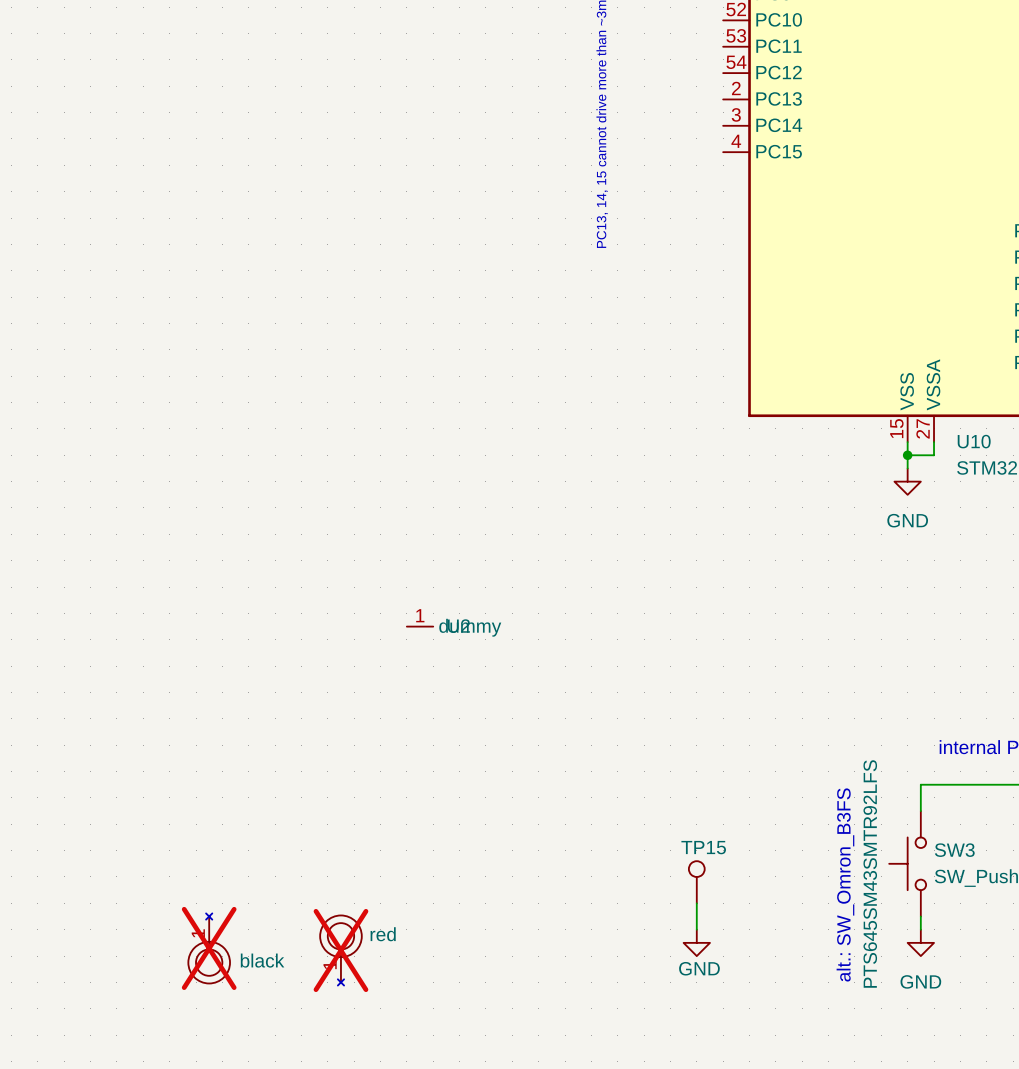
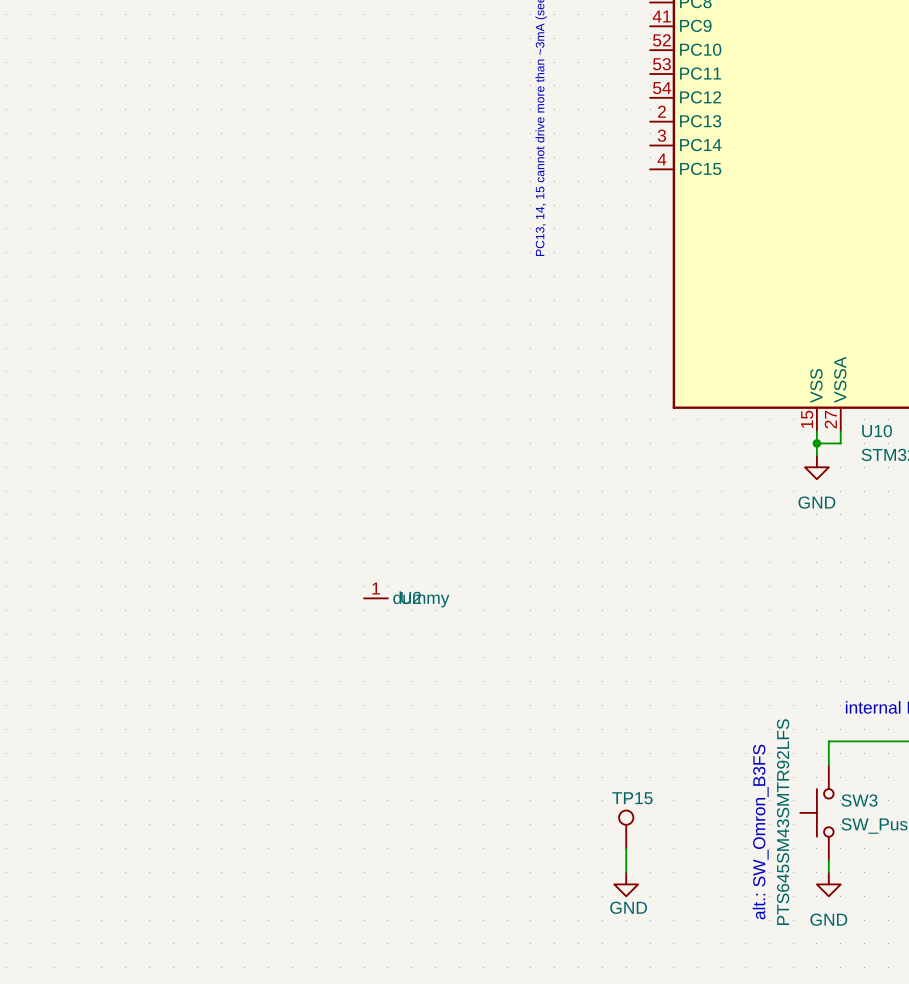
part: (209, 948) -> none
part: (340, 950) -> none

